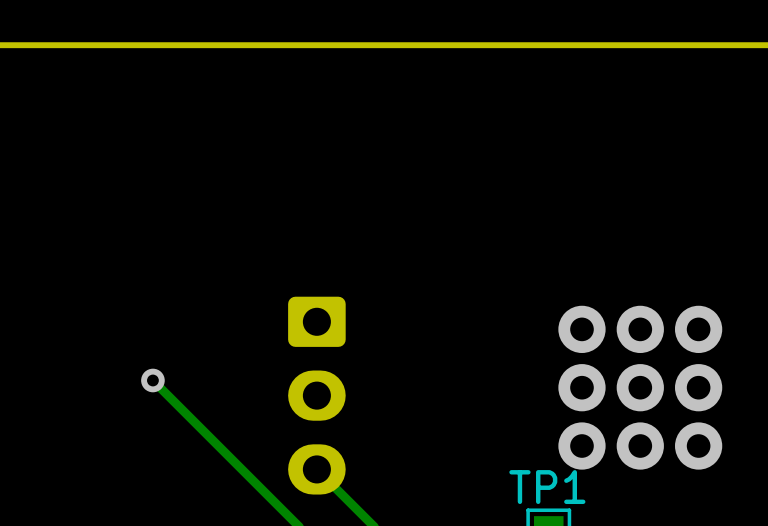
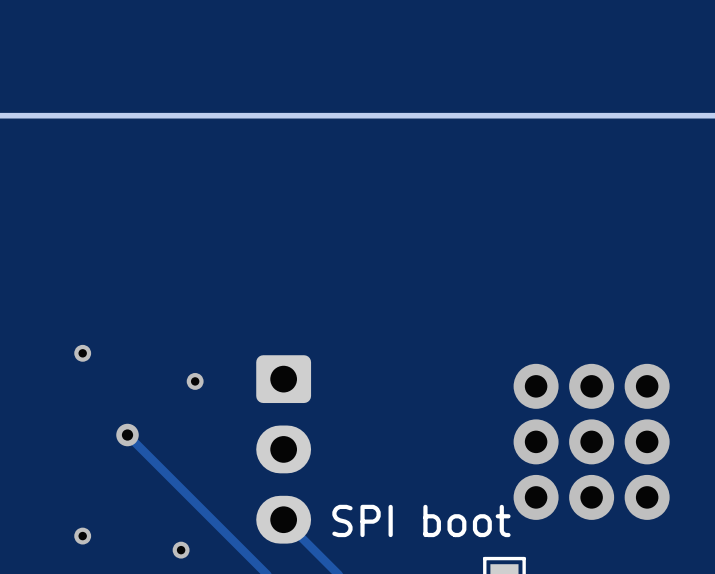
via: none -> (82, 353)
via: none -> (195, 381)
TP1 value: none -> SPI boot (421, 520)
via: none -> (82, 536)
TP1 name: TP1 (547, 487) -> none
via: none -> (181, 550)

